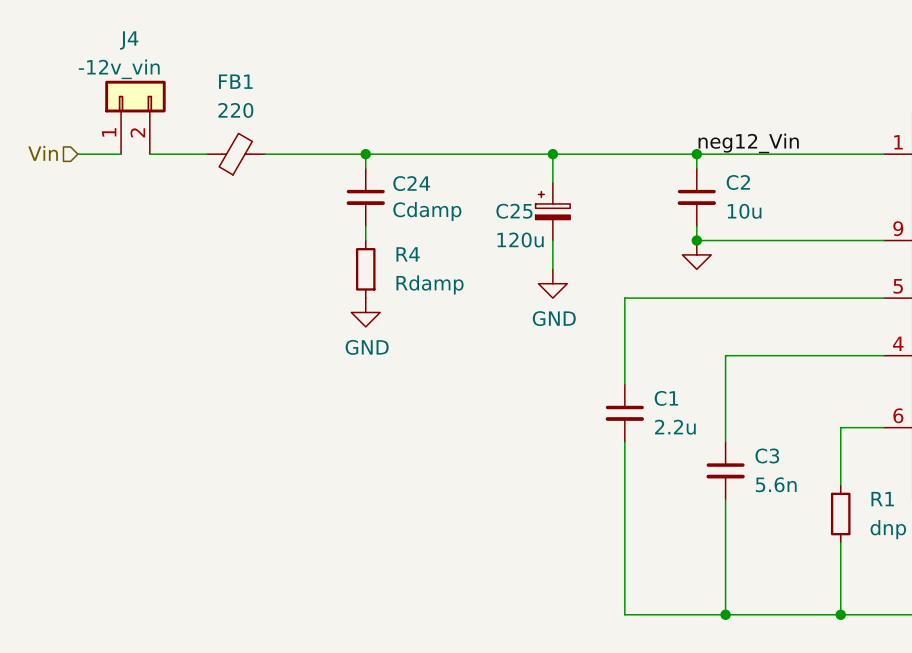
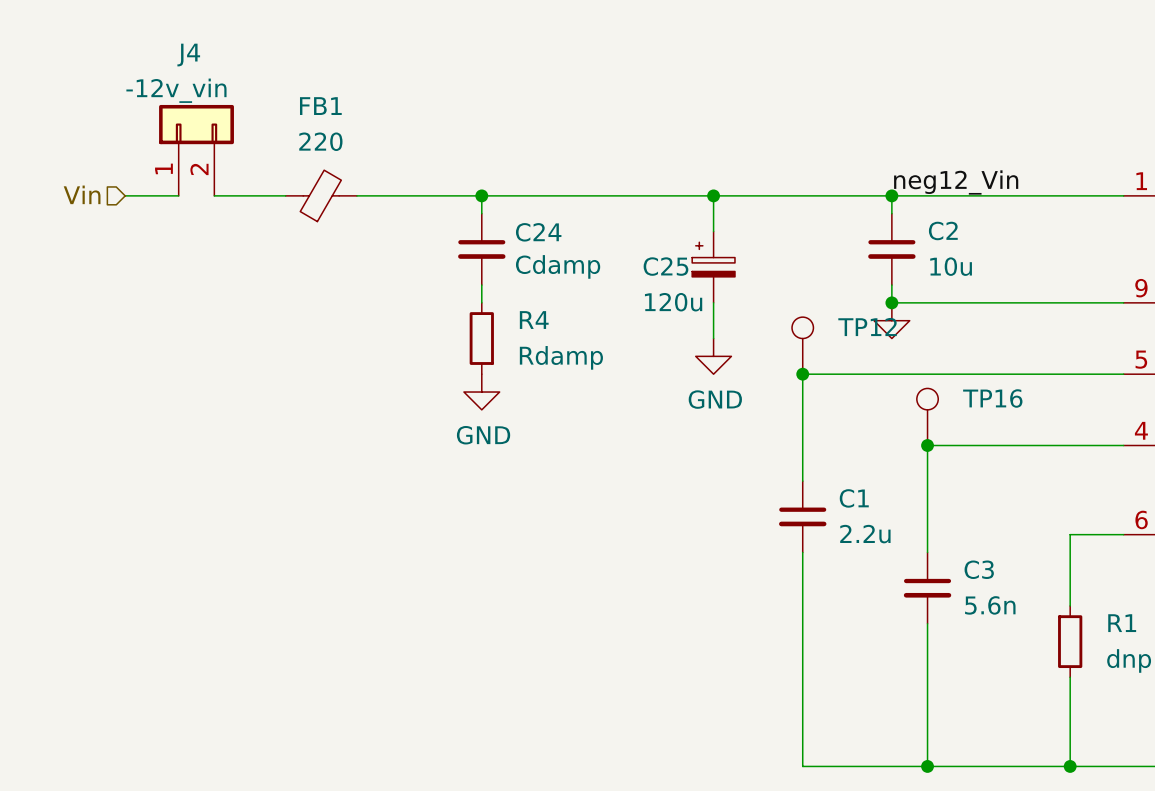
TP12: none -> (802, 345)
junction: none -> (802, 374)
TP16: none -> (927, 416)
junction: none -> (927, 445)

